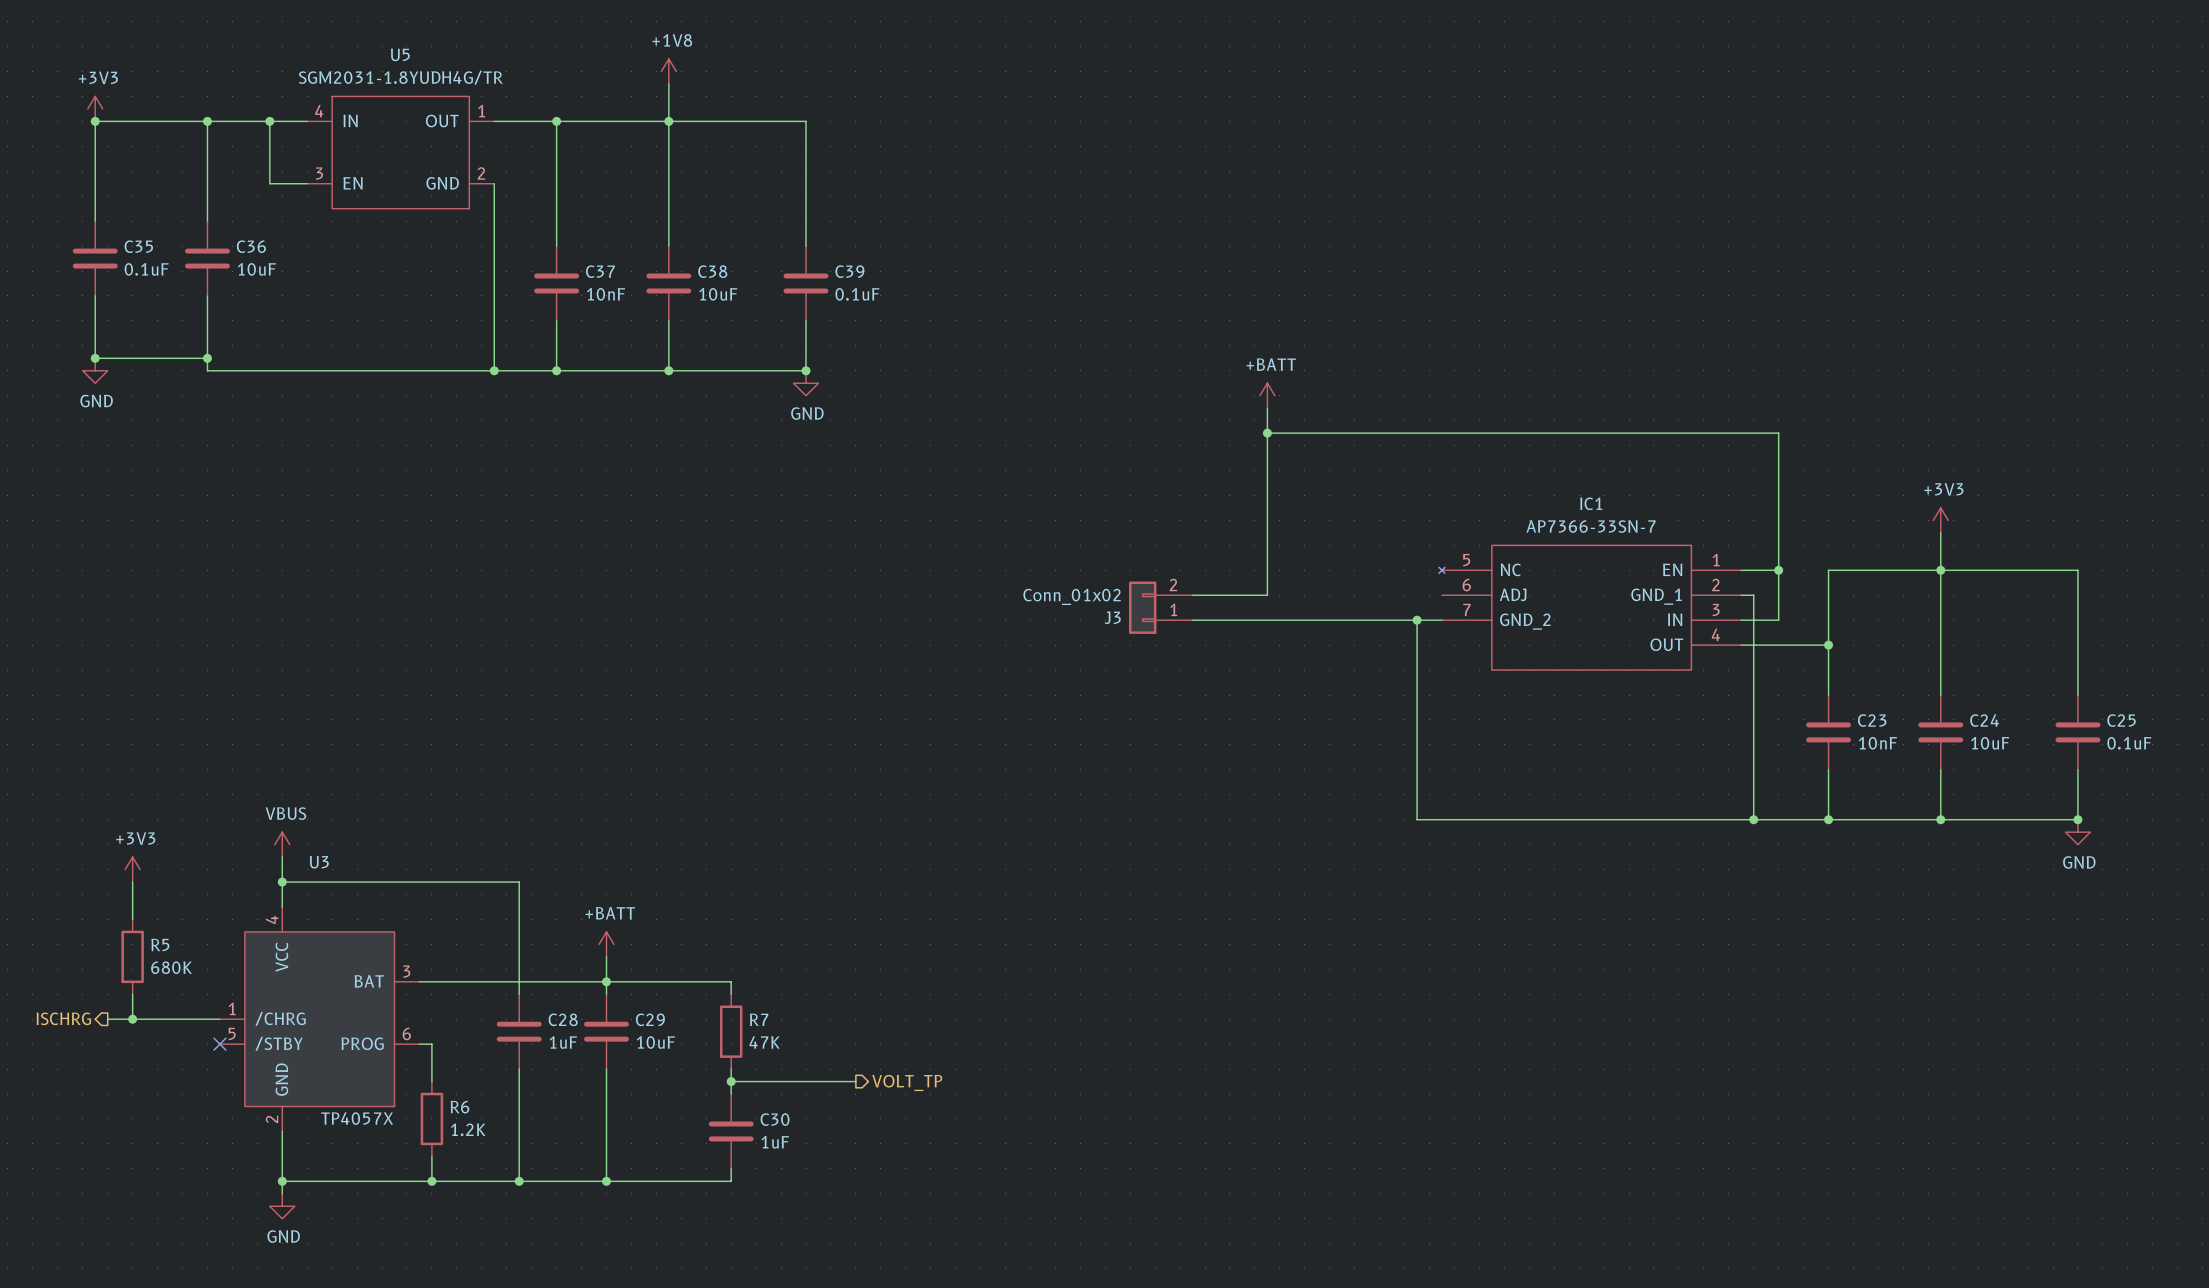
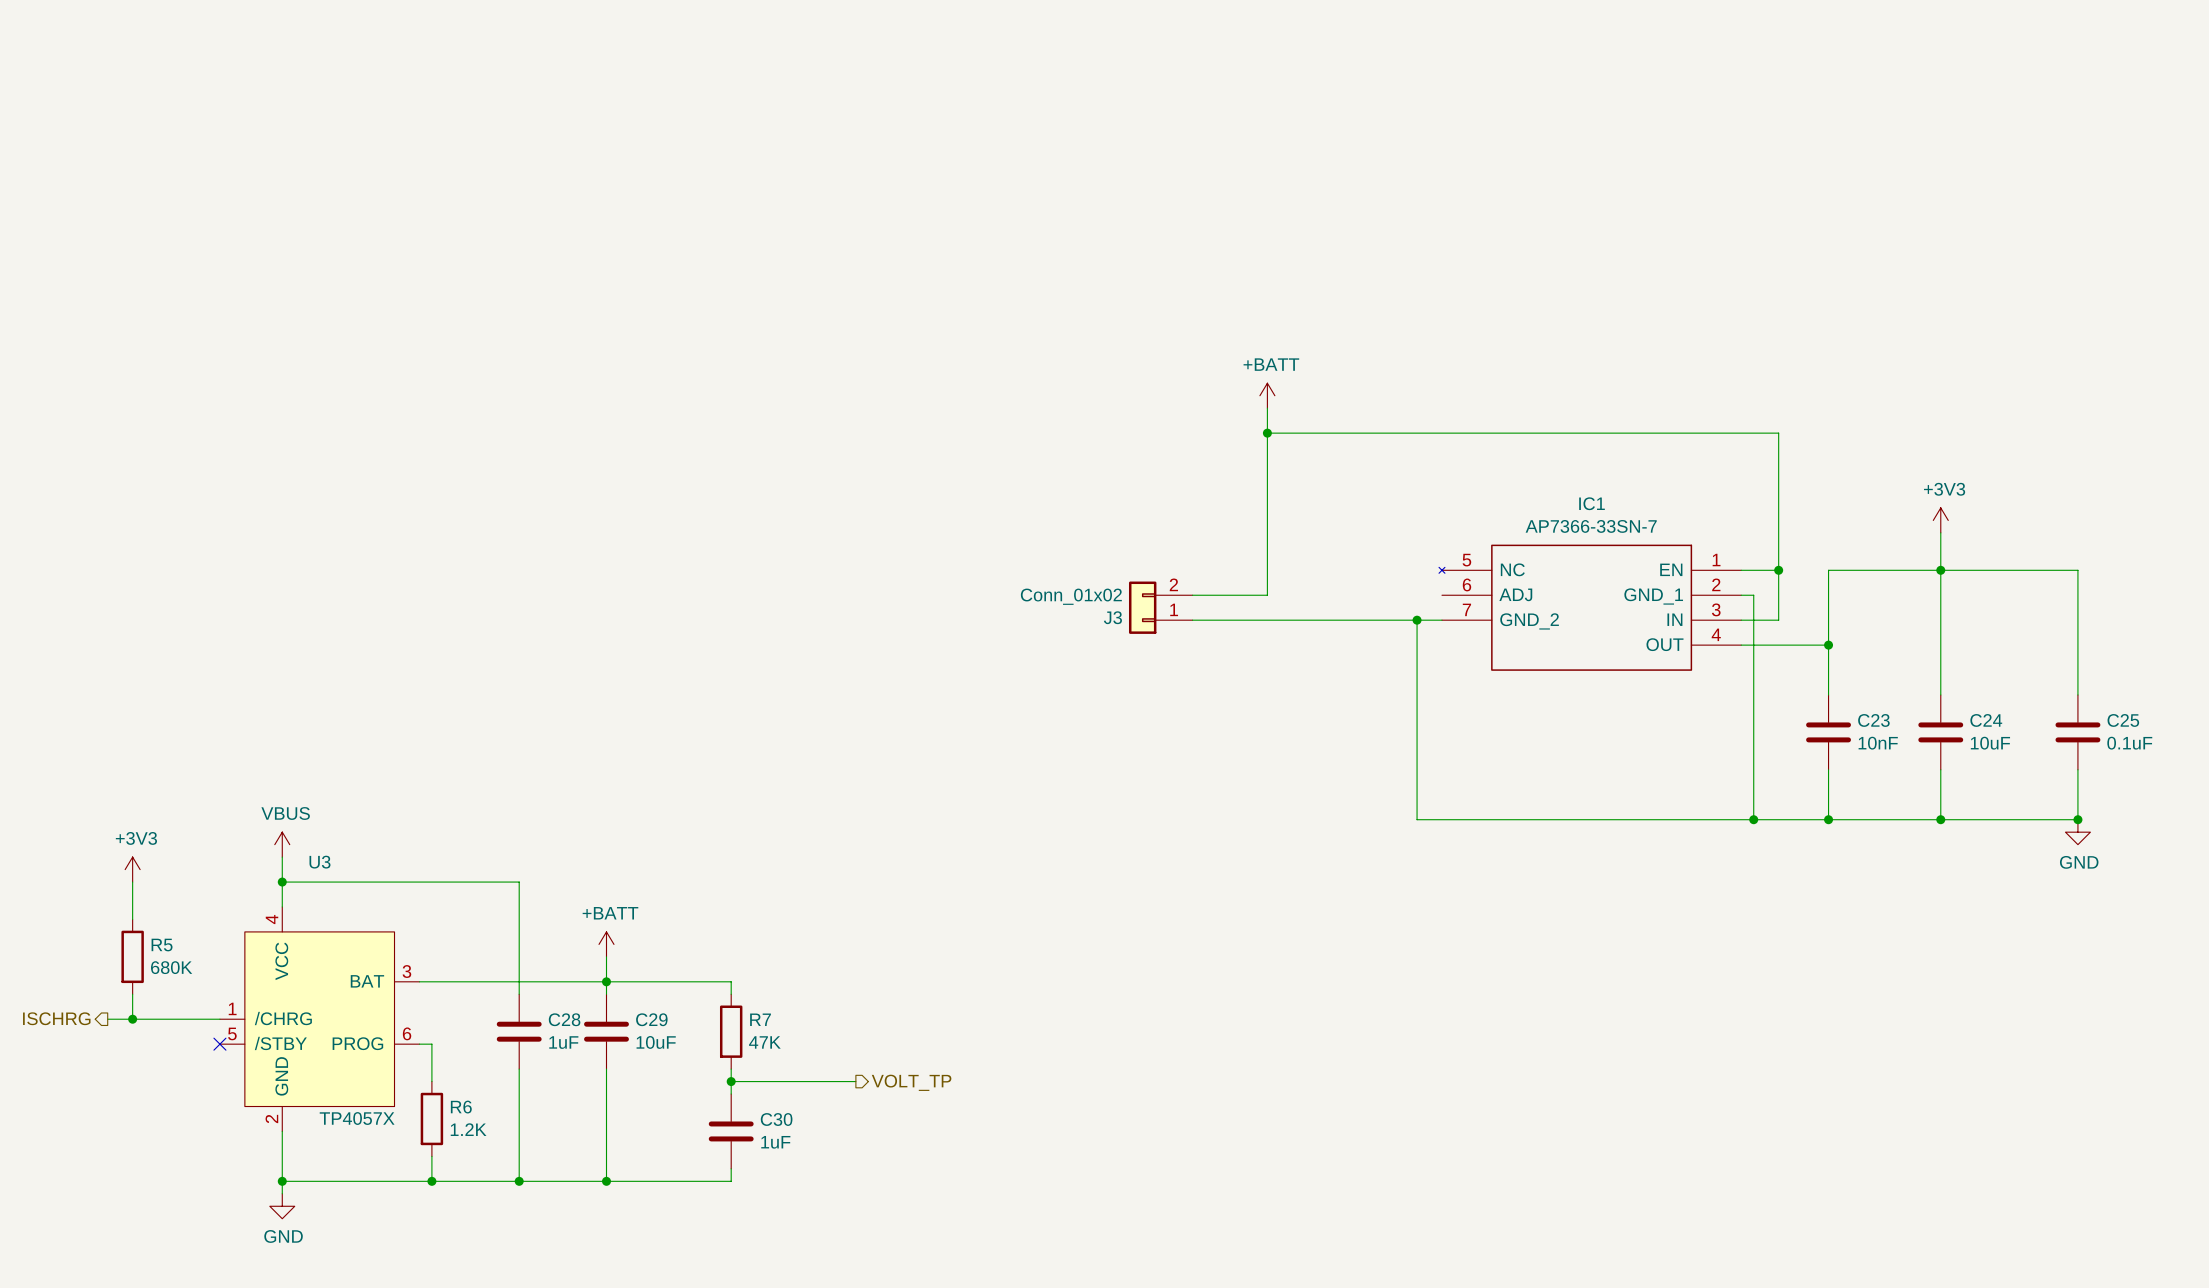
power symbol: +1V8 (668, 71) -> none
wire: (668, 83) (668, 246) -> none
power symbol: +3V3 (95, 108) -> none
junction: (95, 121) -> none
wire: (207, 121) (207, 221) -> none
junction: (207, 121) -> none
wire: (269, 121) (269, 183) (307, 183) -> none
junction: (269, 121) -> none
wire: (307, 121) (95, 121) (95, 221) -> none
wire: (494, 121) (806, 121) (806, 246) -> none
wire: (556, 121) (556, 246) -> none
junction: (556, 121) -> none
junction: (668, 121) -> none
U5: SGM2031-1.8YUDH4G/TR (400, 152) -> none
wire: (494, 183) (494, 370) -> none
C35: 0.1uF (95, 258) -> none
C36: 10uF (207, 258) -> none
C37: 10nF (556, 283) -> none
C38: 10uF (668, 283) -> none
C39: 0.1uF (806, 283) -> none
wire: (95, 295) (95, 358) (207, 358) -> none
wire: (207, 295) (207, 370) (806, 370) (806, 320) -> none
wire: (556, 320) (556, 370) -> none
wire: (668, 320) (668, 370) -> none
junction: (95, 358) -> none
junction: (207, 358) -> none
power symbol: GND (95, 370) -> none
junction: (494, 370) -> none
junction: (556, 370) -> none
junction: (668, 370) -> none
junction: (806, 370) -> none
power symbol: GND (806, 383) -> none

